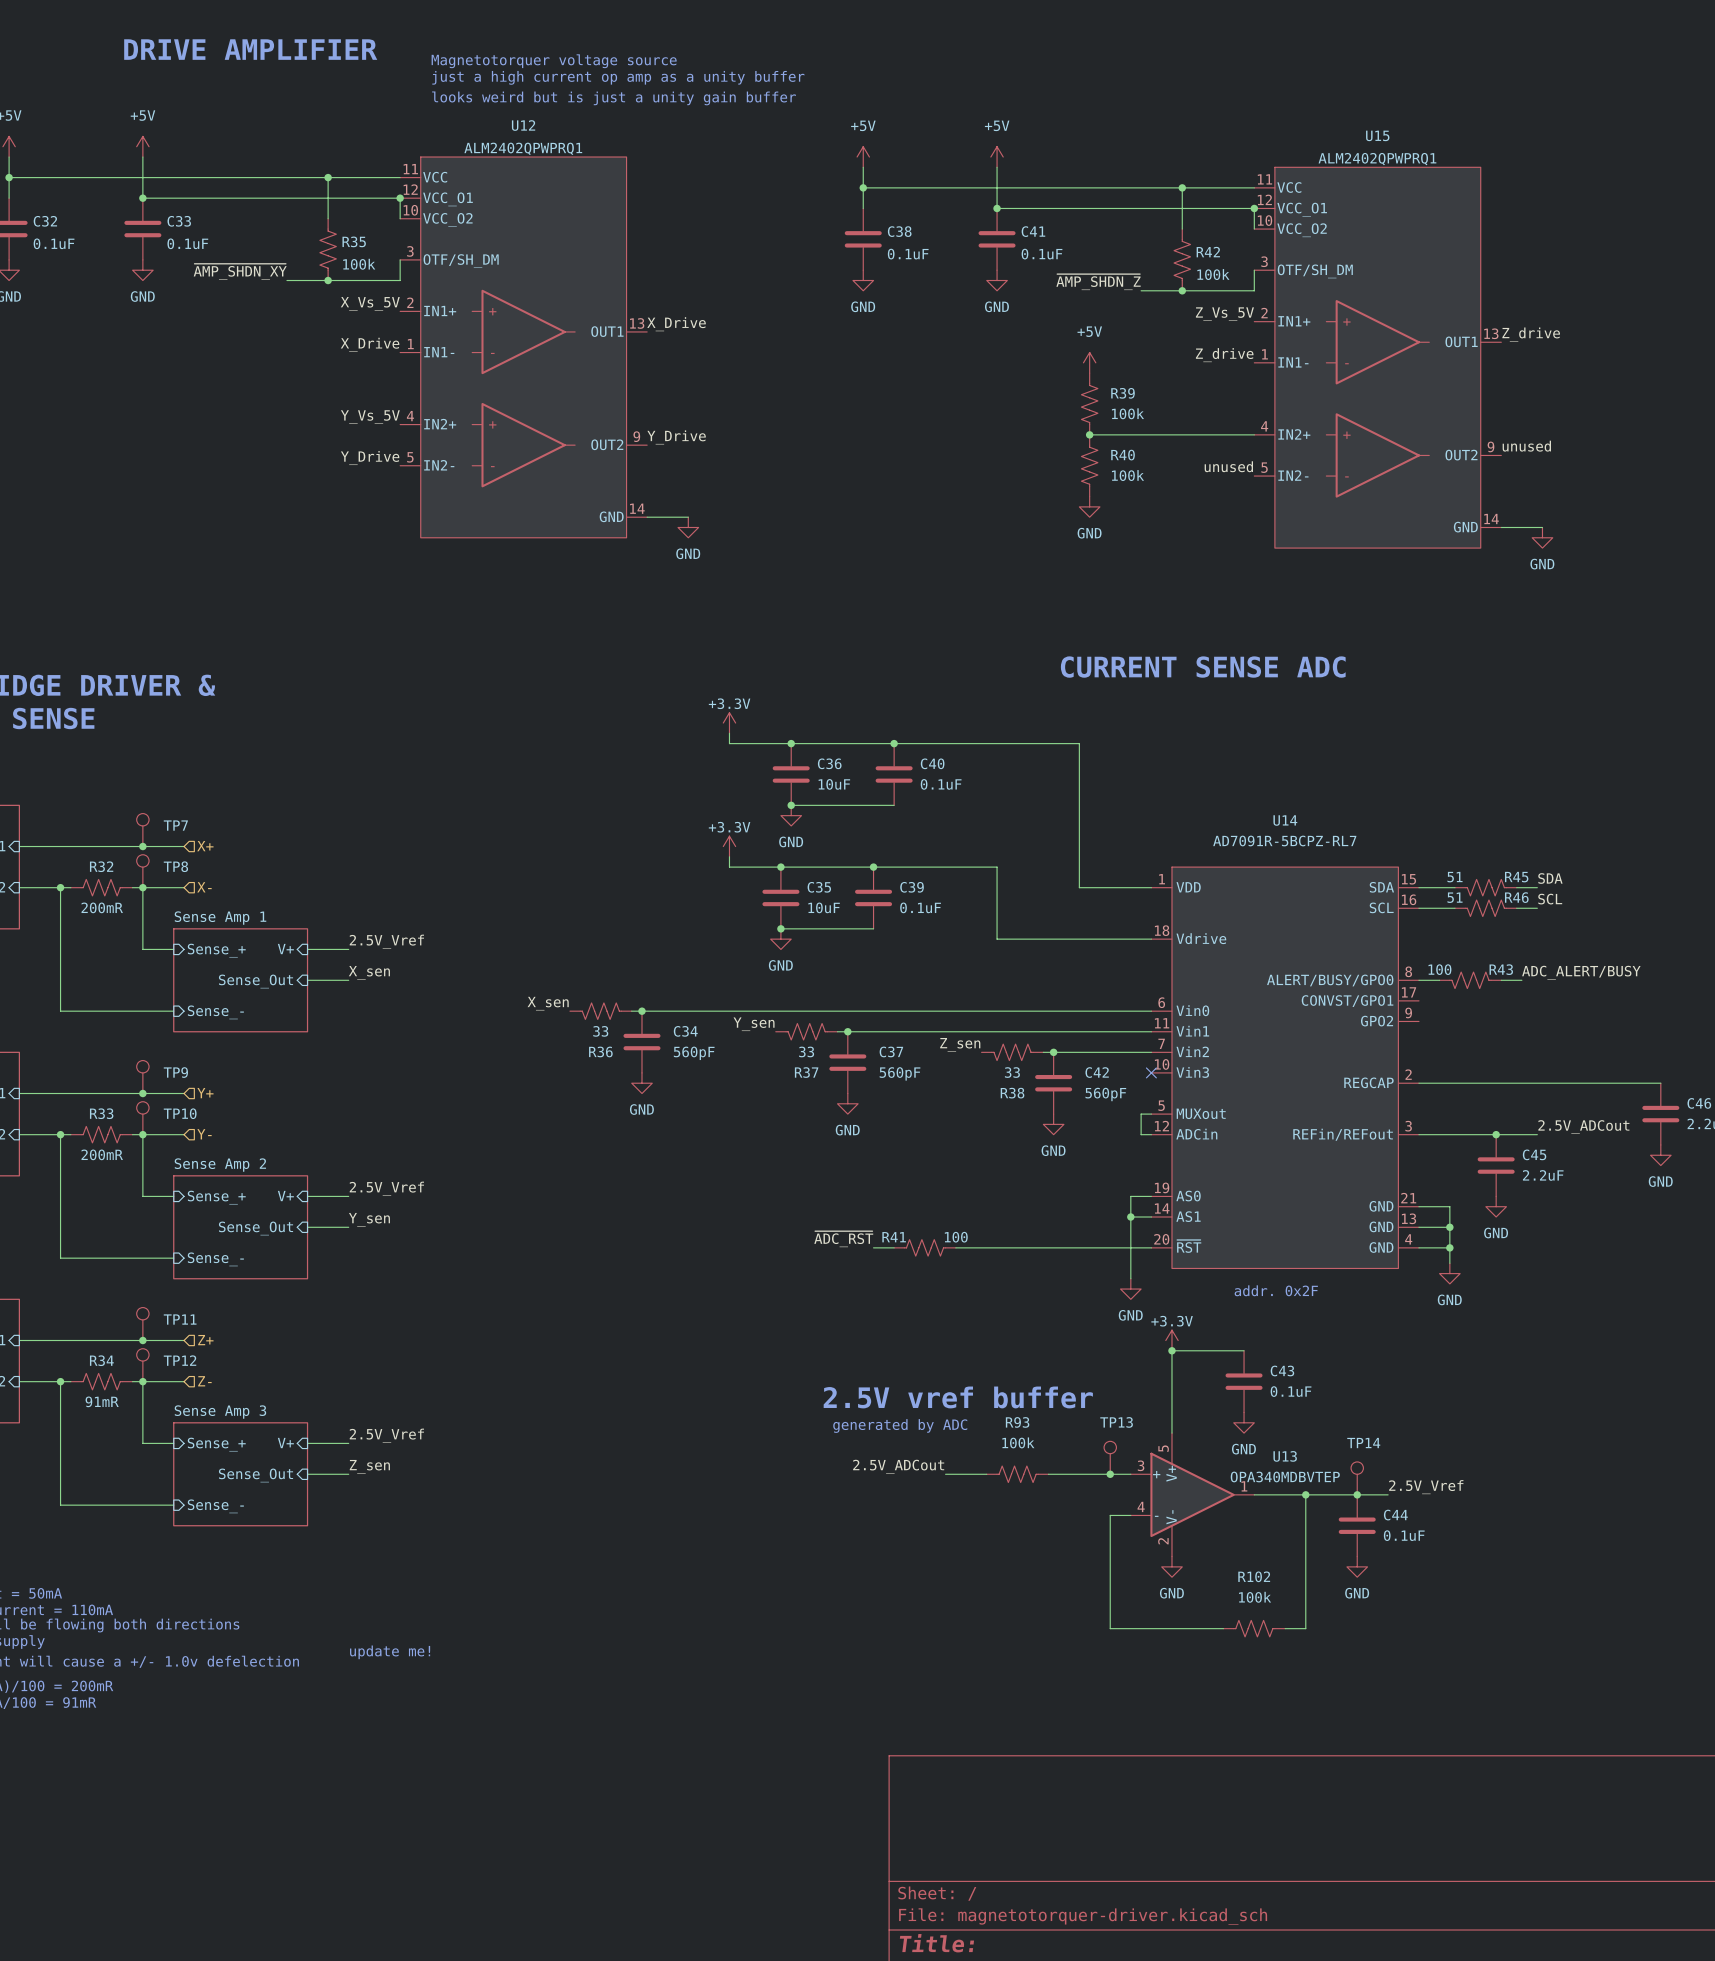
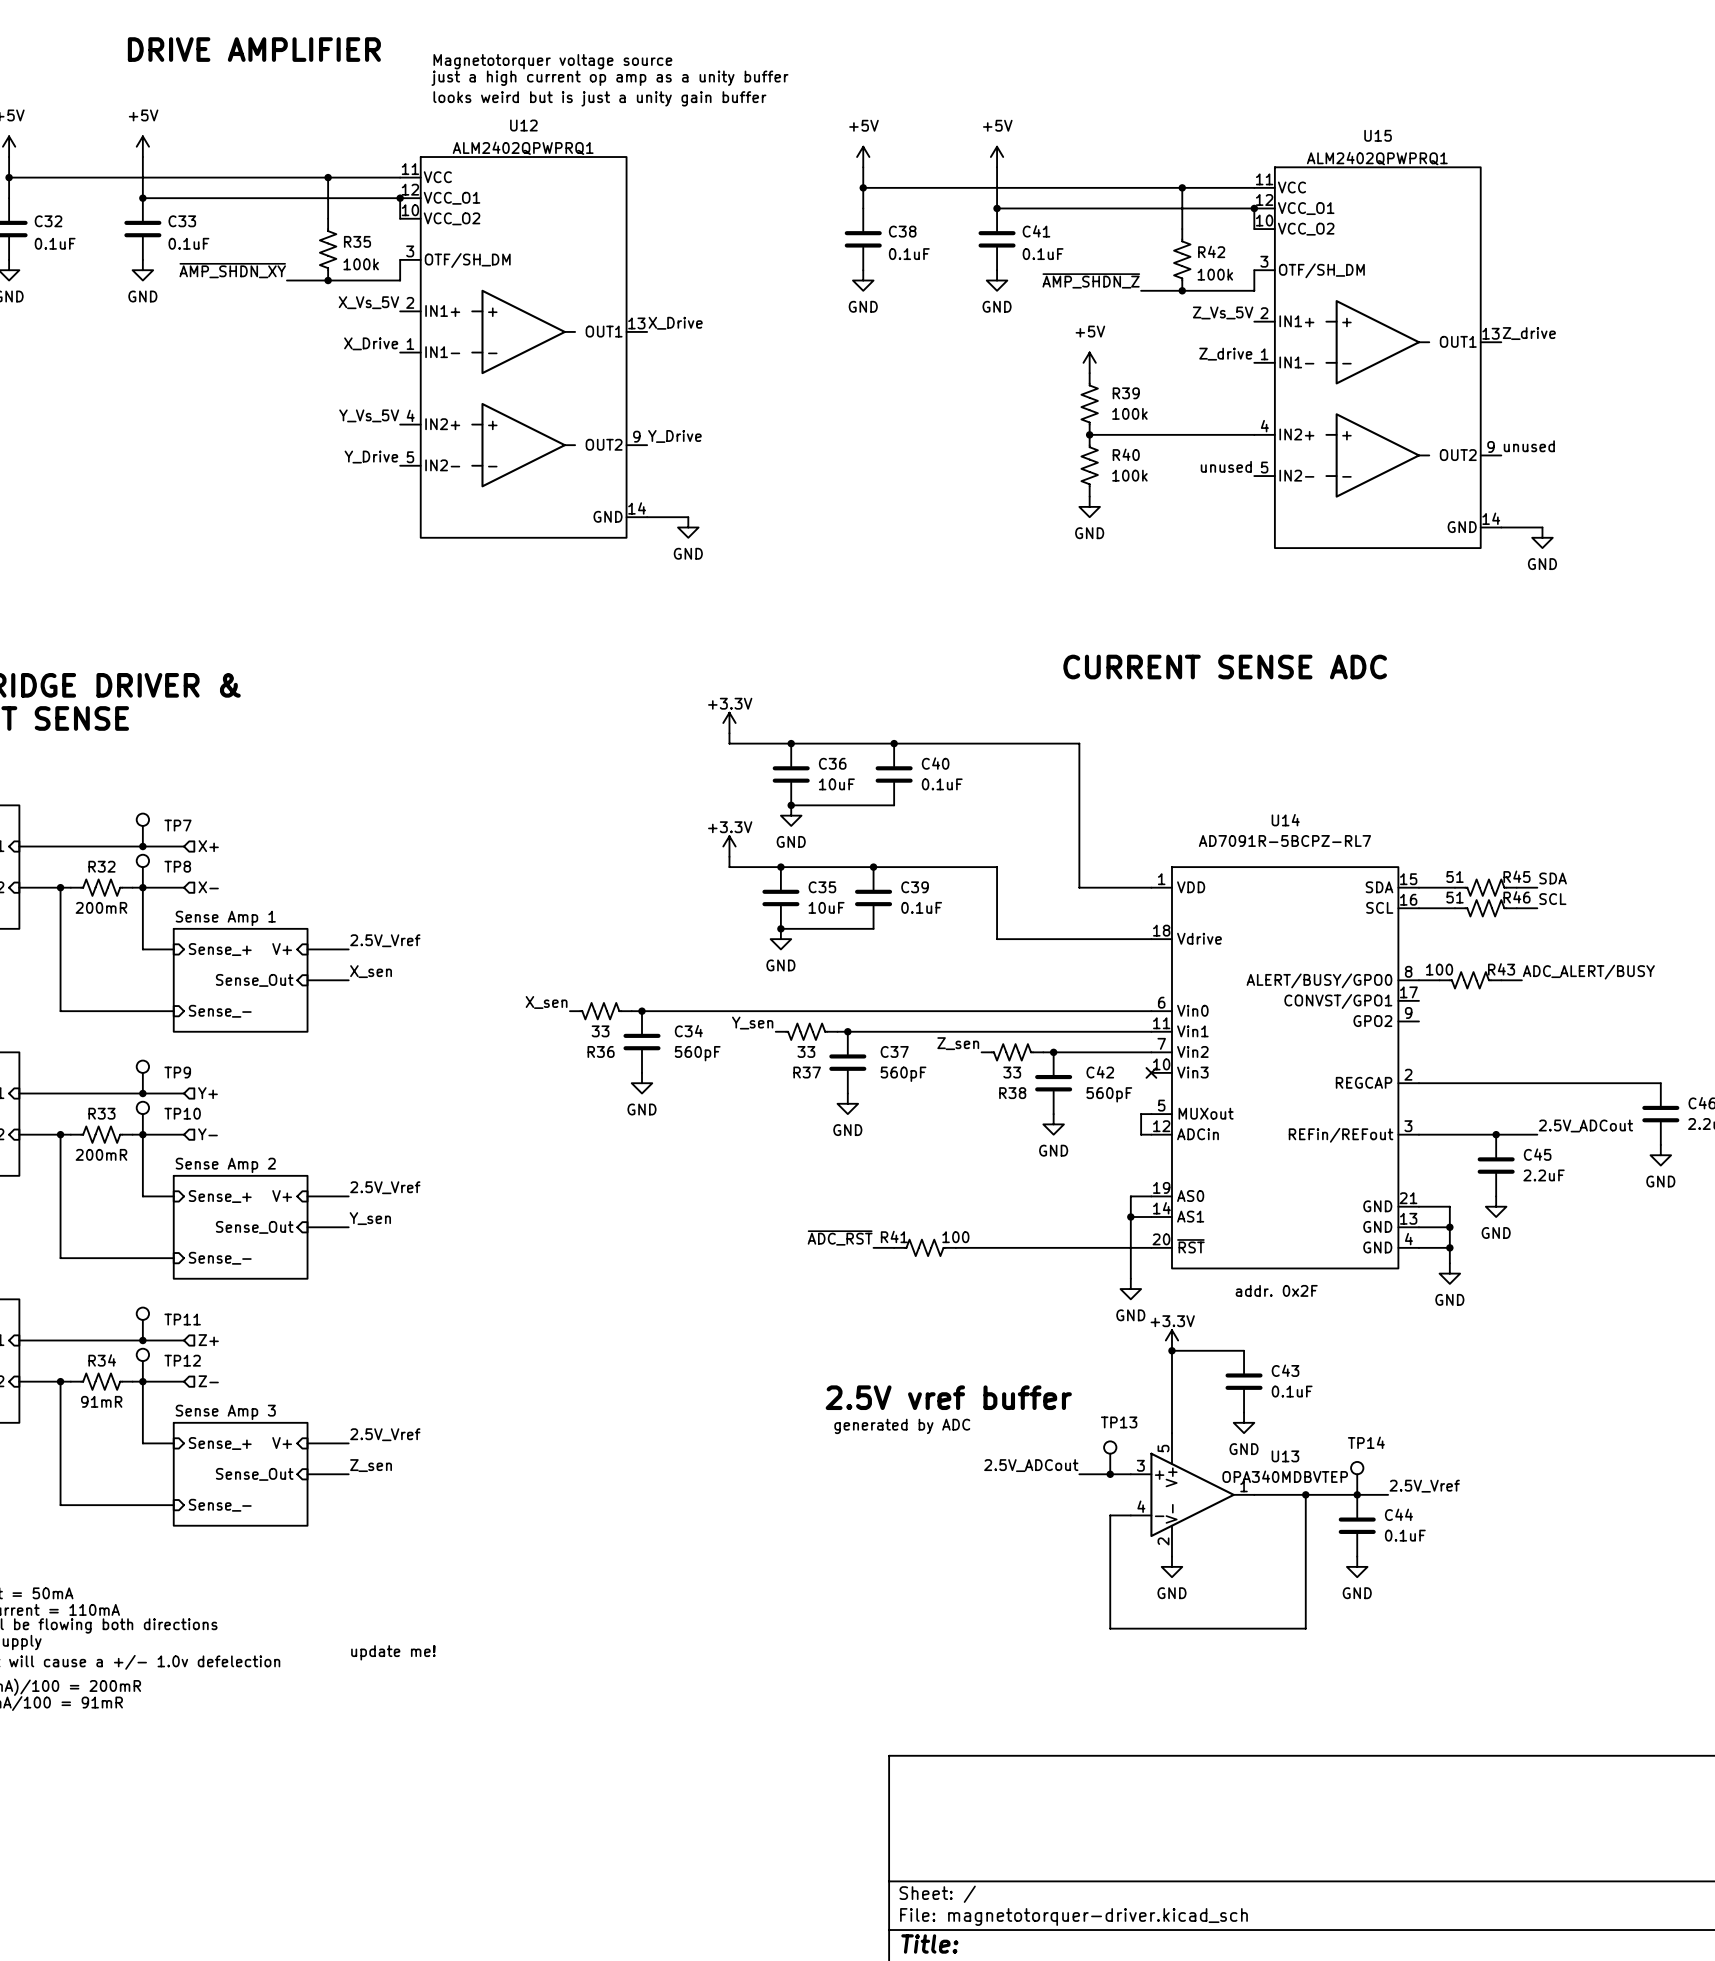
label position: 2.5V_ADCout (898, 1466) -> 2.5V_ADCout (1031, 1465)
wire: (945, 1474) (986, 1474) -> none
R93: 100k (1017, 1474) -> none
wire: (1048, 1474) (1079, 1474) -> none
R102: 100k (1254, 1628) -> none

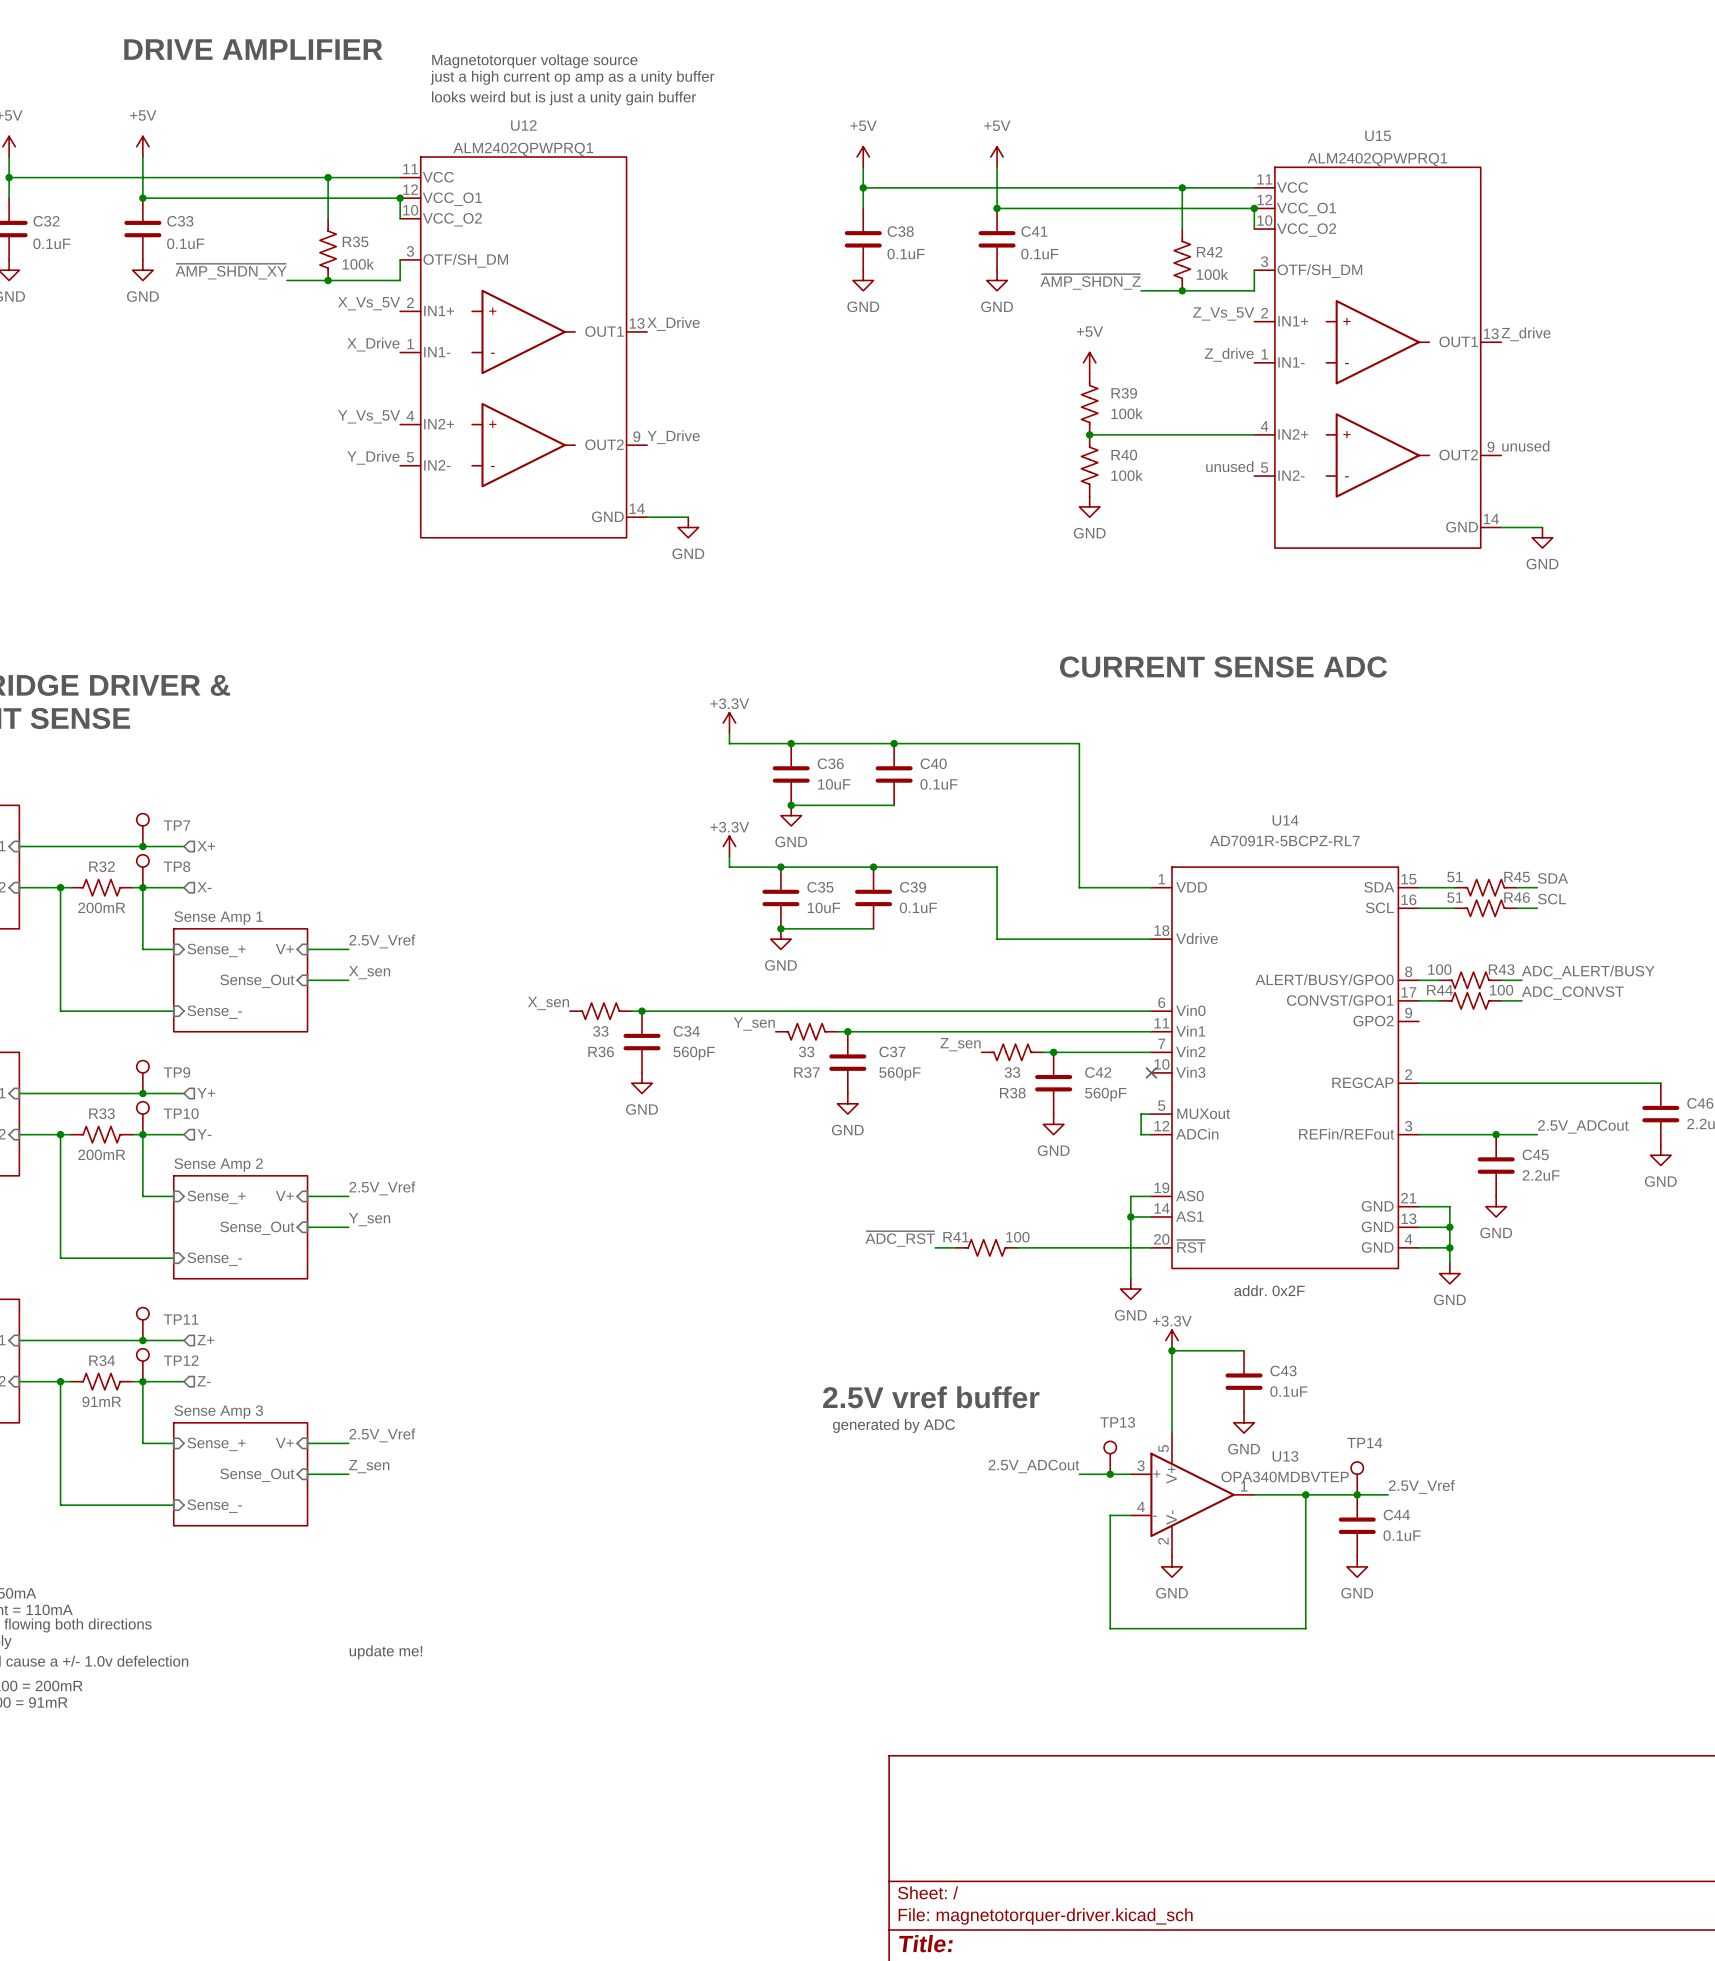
label: none -> ADC_CONVST (1572, 993)
wire: none -> (1418, 1000) (1439, 1000)
R44: none -> 100 (1470, 1000)
wire: none -> (1501, 1000) (1521, 1000)
label position: ~{ADC_RST} (840, 1238) -> ~{ADC_RST} (900, 1238)
wire: (873, 1247) (894, 1247) -> none
R41 position: (925, 1247) -> (986, 1247)

